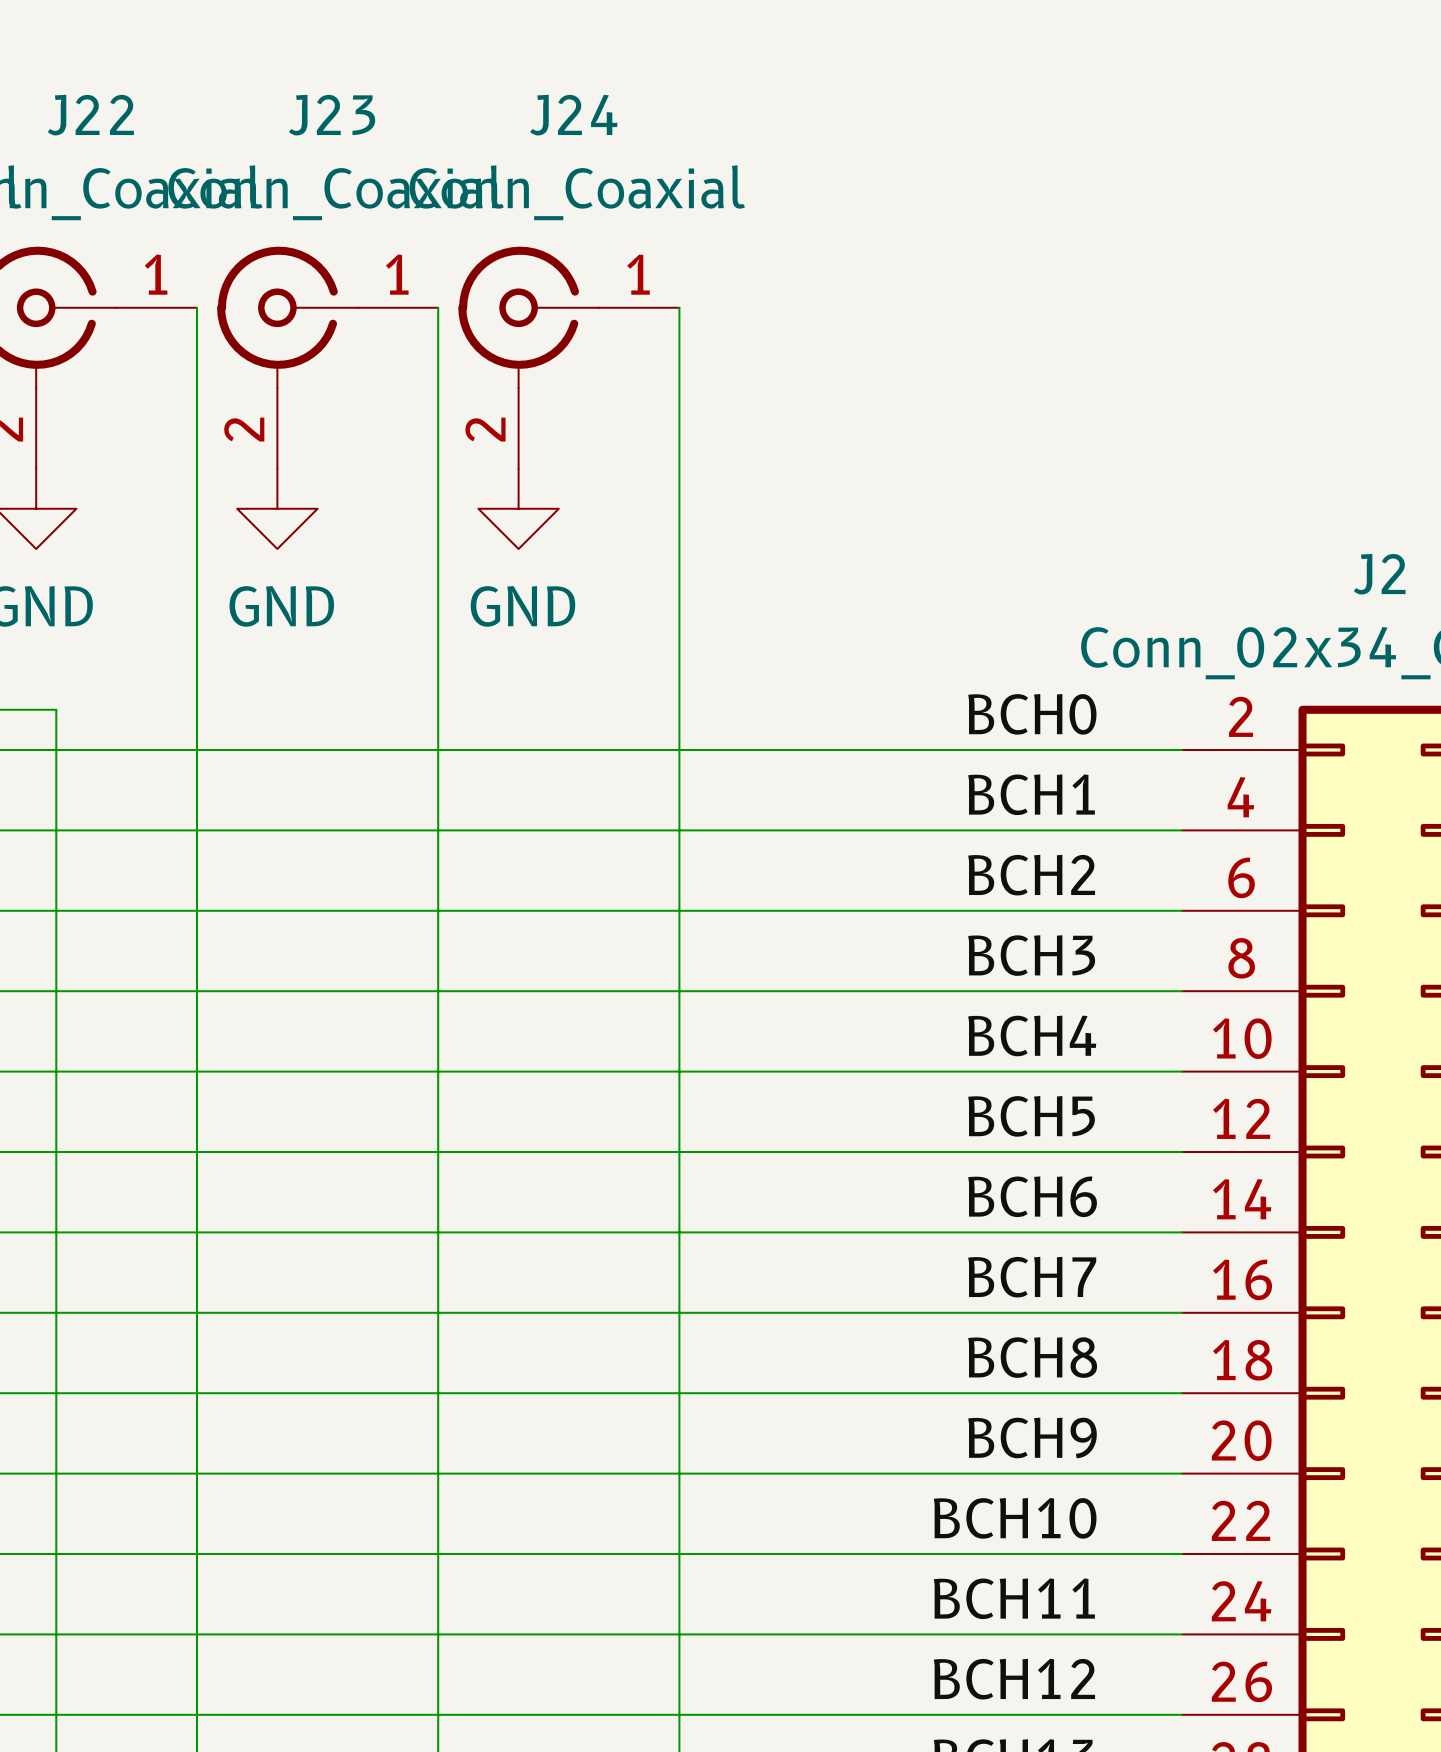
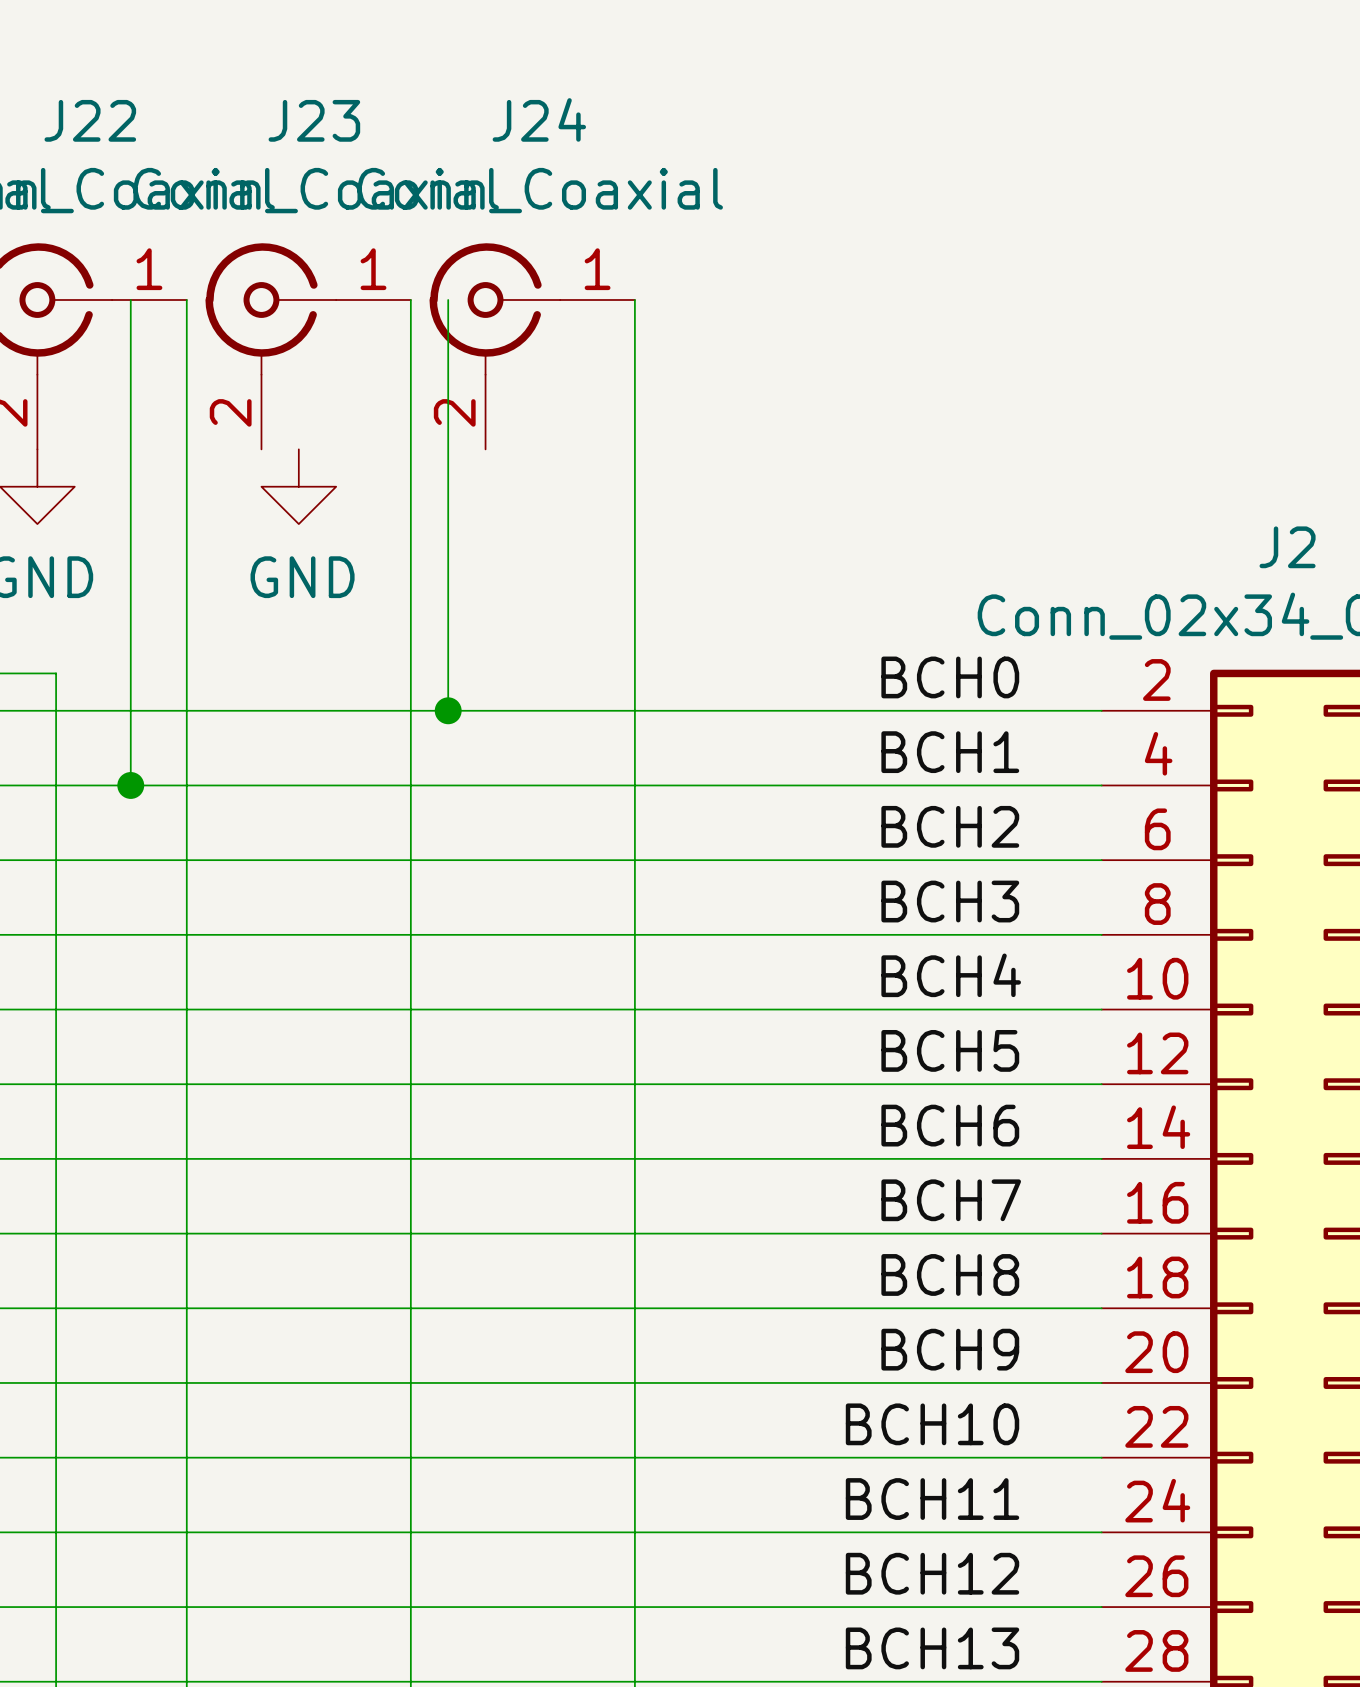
wire: none -> (130, 299) (130, 785)
wire: none -> (448, 299) (448, 710)
power symbol position: GND (277, 508) -> GND (298, 486)
power symbol: GND (518, 508) -> none
junction: none -> (448, 710)
junction: none -> (130, 785)

